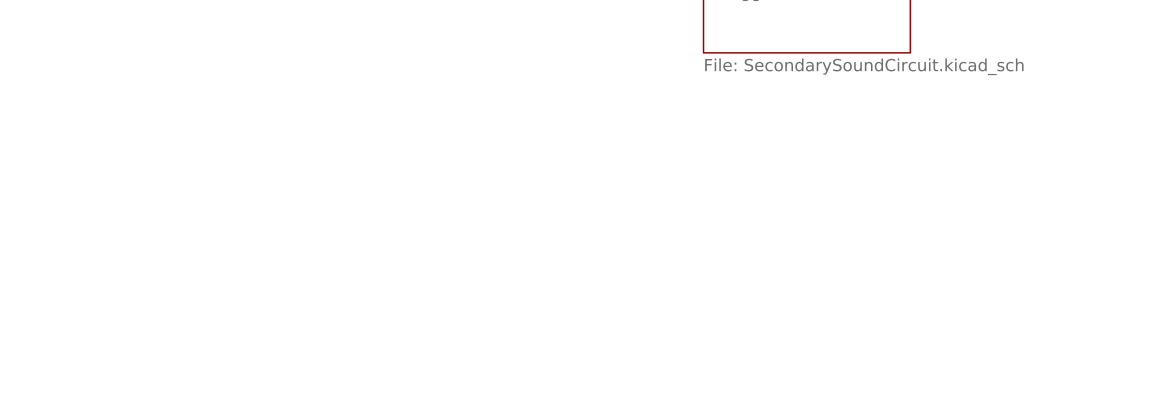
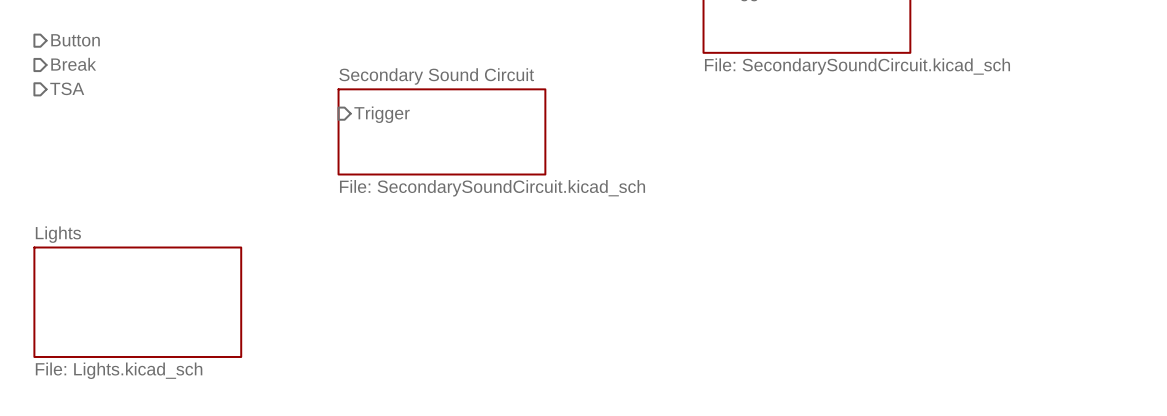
sheet pin: none -> Button (75, 40)
sheet pin: none -> Break (73, 64)
sheet pin: none -> TSA (67, 88)
sheet pin: none -> Trigger (382, 114)
sheet Secondary Sound Circuit: none -> File: SecondarySoundCircuit.kicad_sch (441, 131)
sheet Lights: none -> File: Lights.kicad_sch (137, 302)

